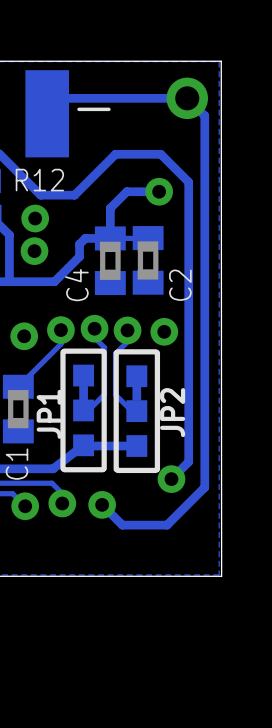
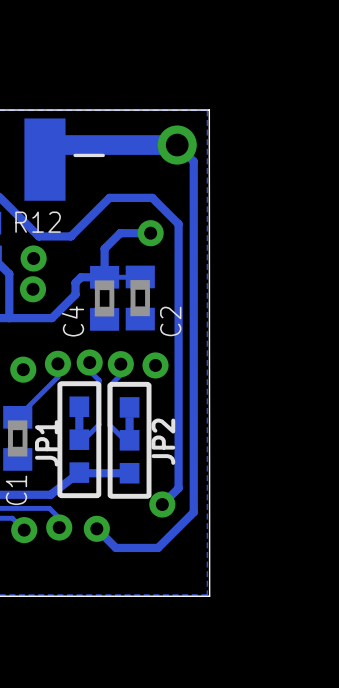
track width: thin (187, 98) (62, 98) -> thick (177, 145) (59, 145)

